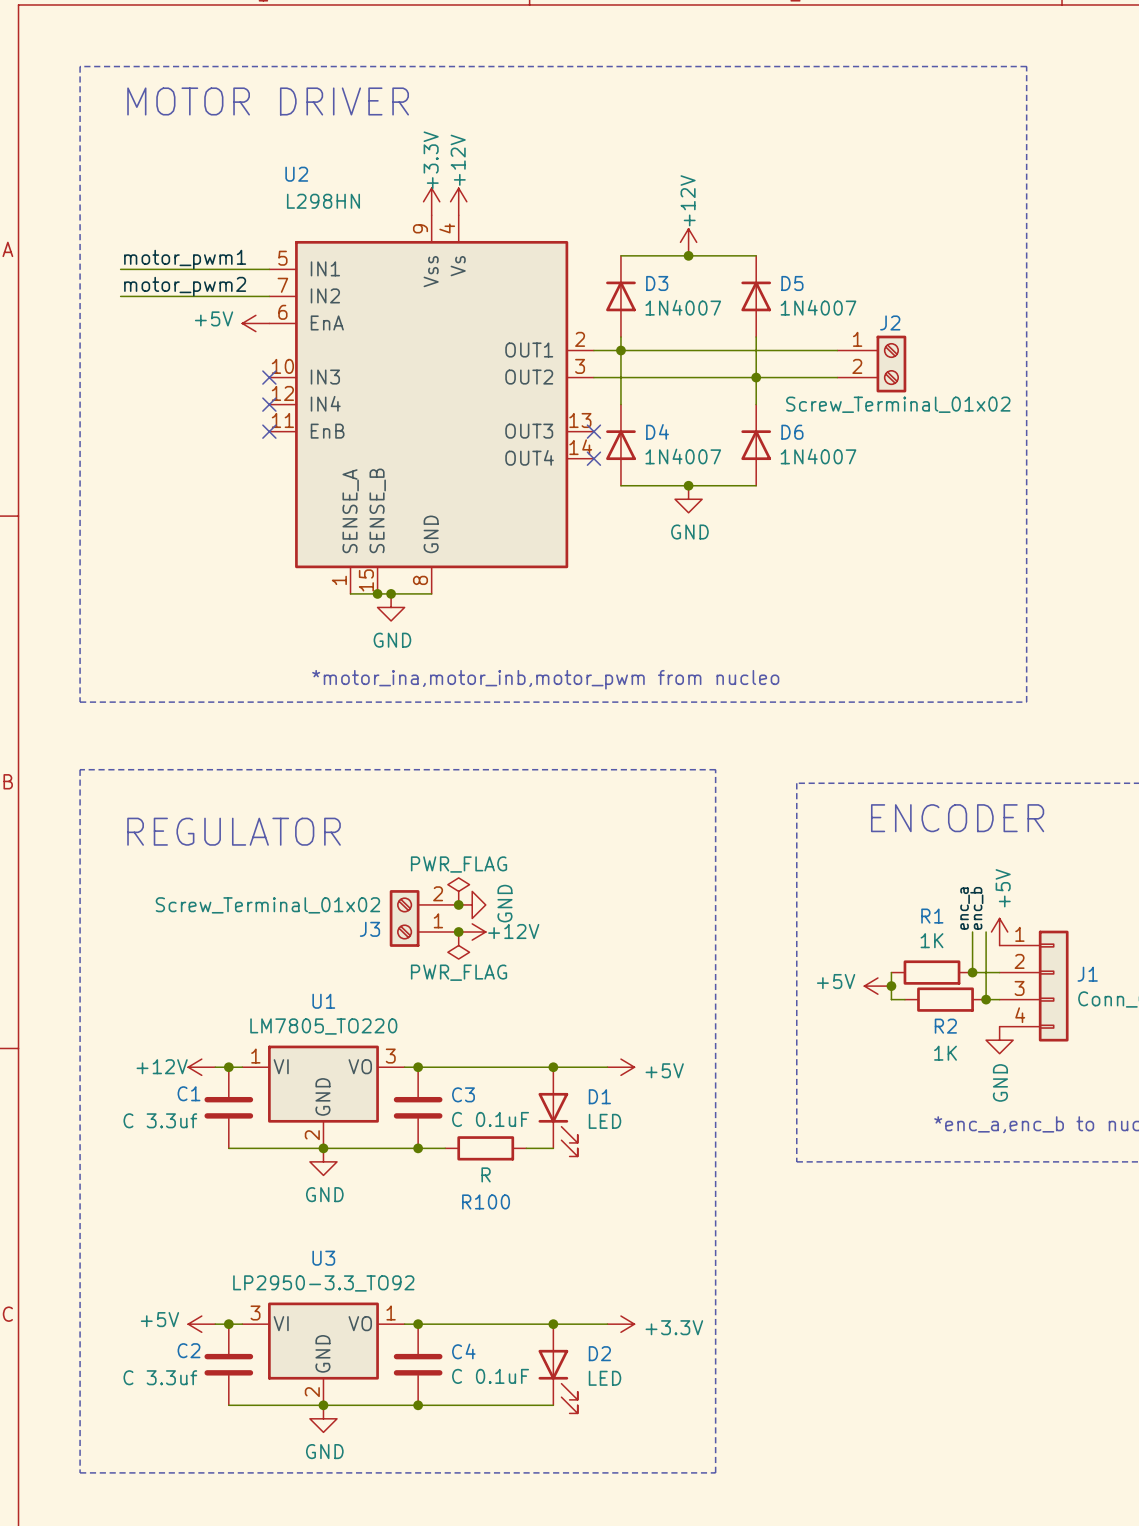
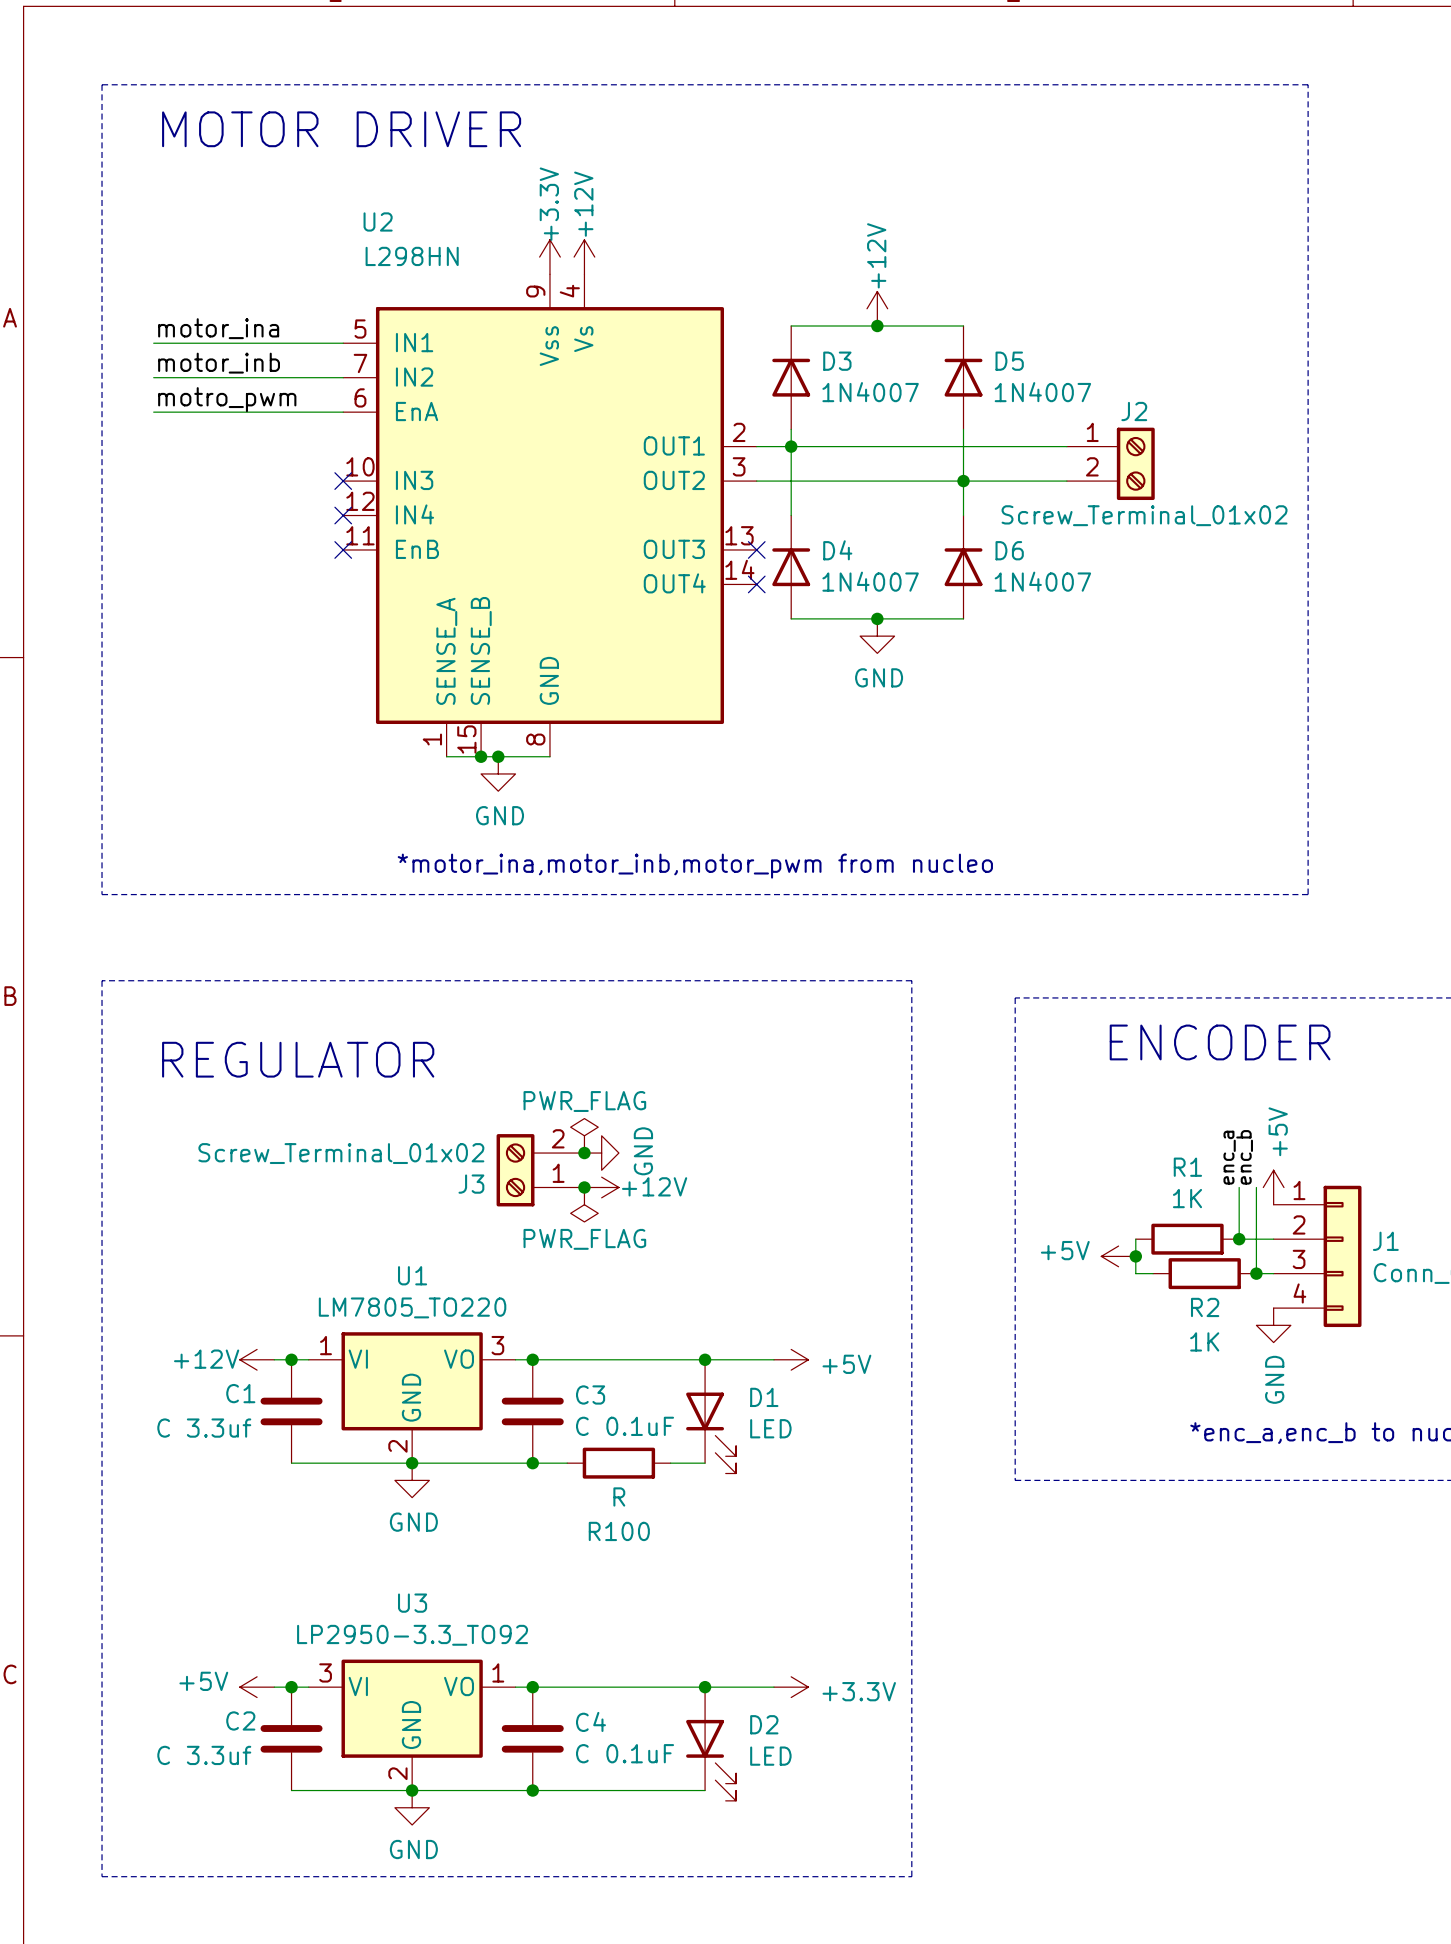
label: motor_pwm1 (185, 259) -> motor_ina (218, 328)
label: motor_pwm2 (185, 286) -> motor_inb (219, 363)
label: none -> motro_pwm (227, 399)
wire: none -> (153, 412) (343, 412)
power symbol: +5V (255, 323) -> none

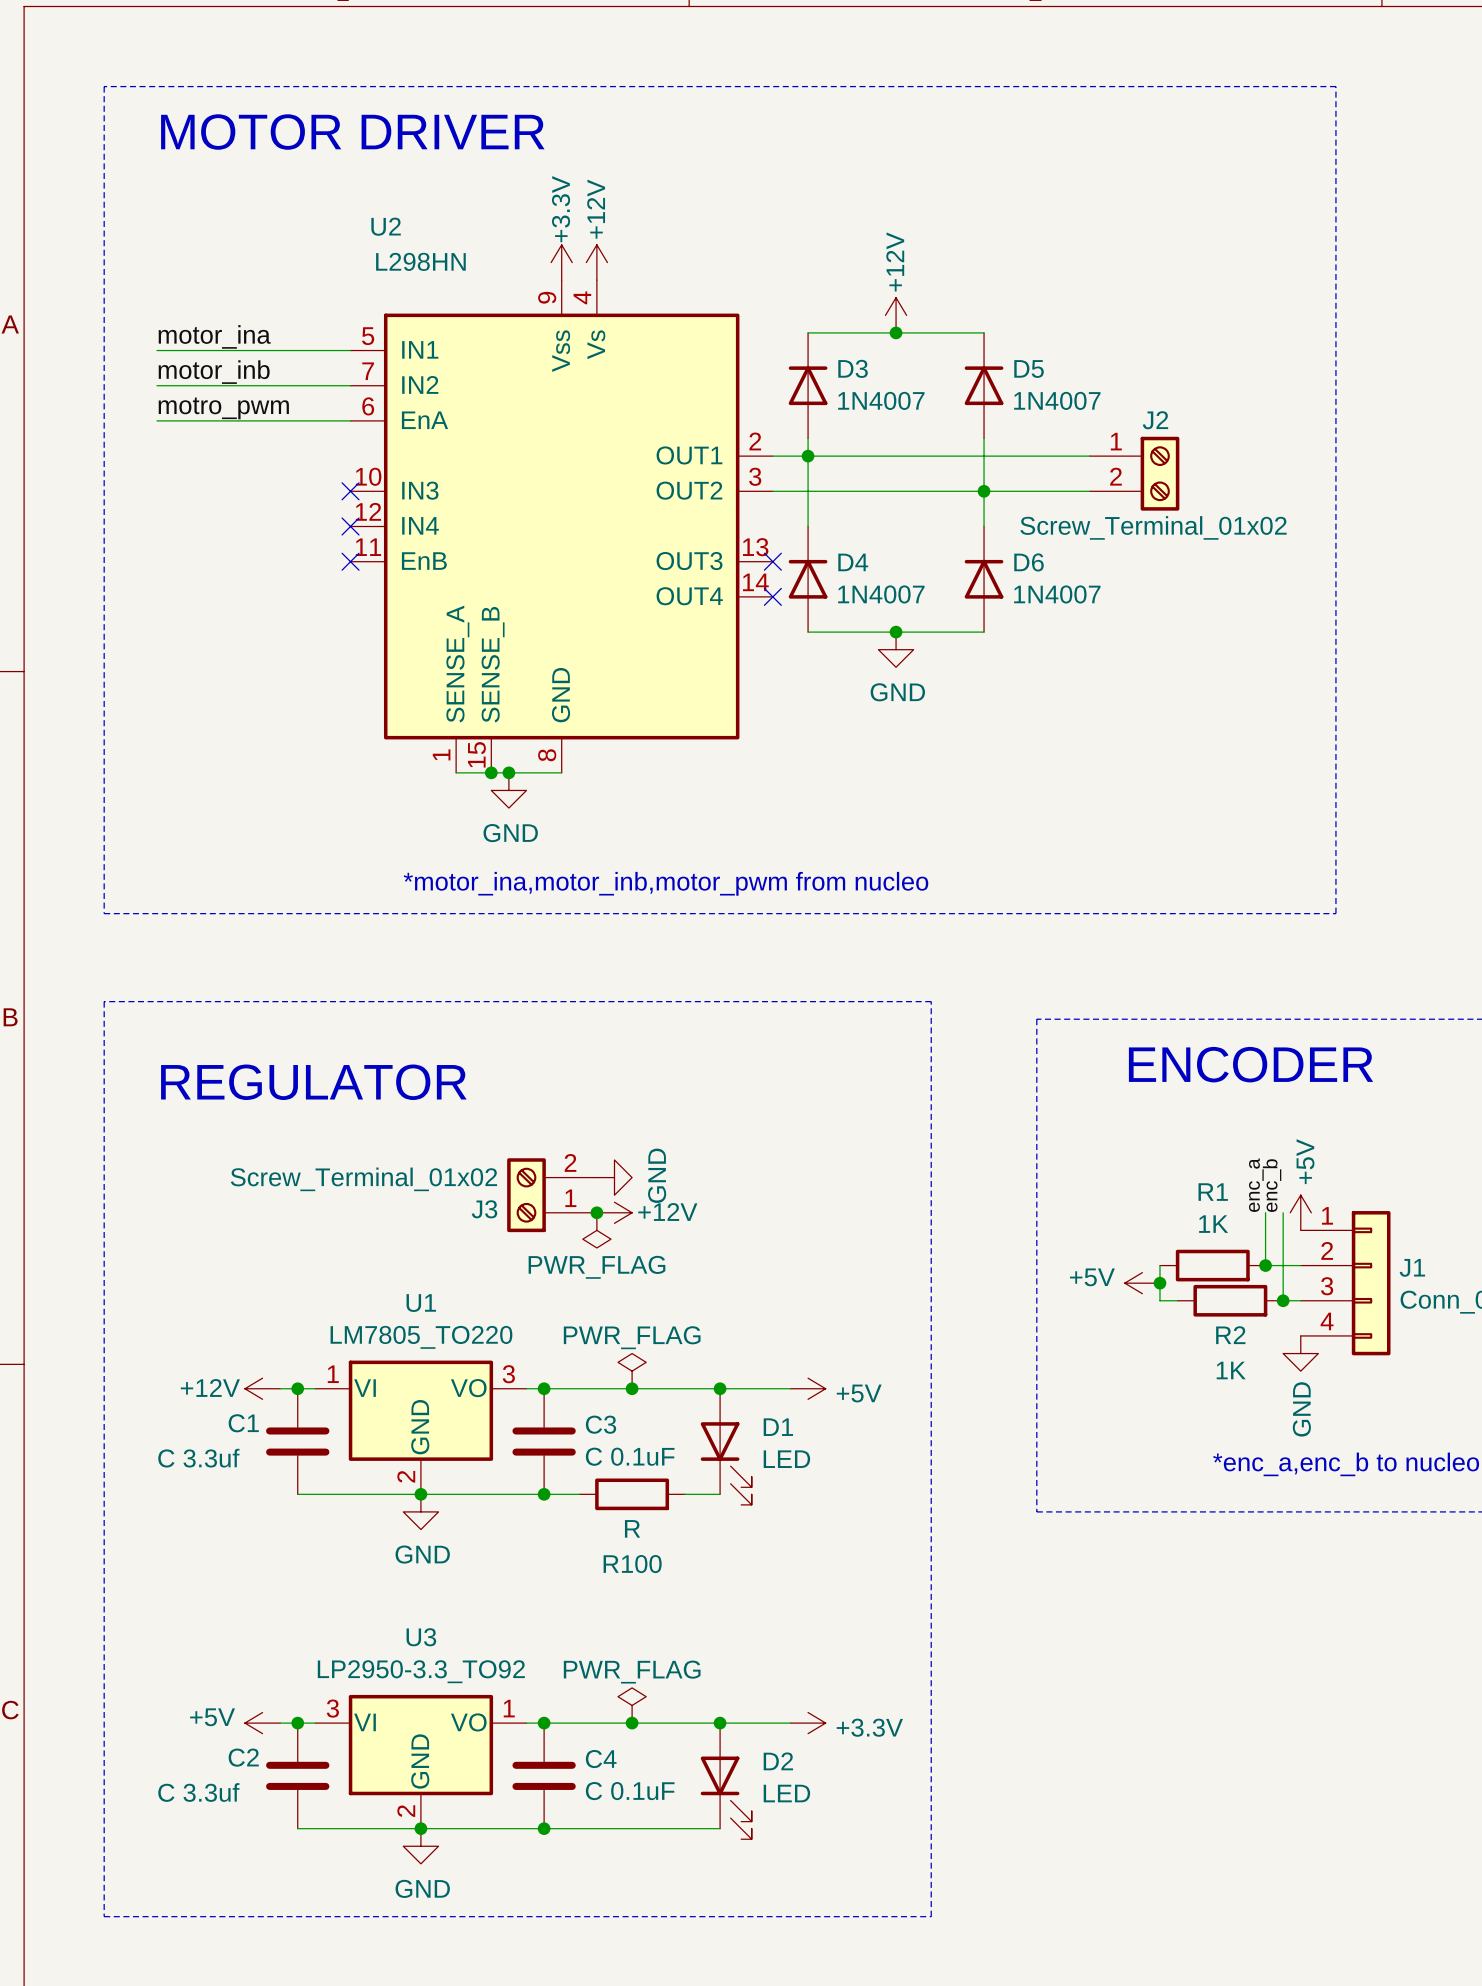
power symbol position: PWR_FLAG (584, 1135) -> PWR_FLAG (632, 1371)
junction: (584, 1153) -> none
junction: none -> (632, 1388)
power symbol: none -> PWR_FLAG (632, 1705)
junction: none -> (632, 1723)

